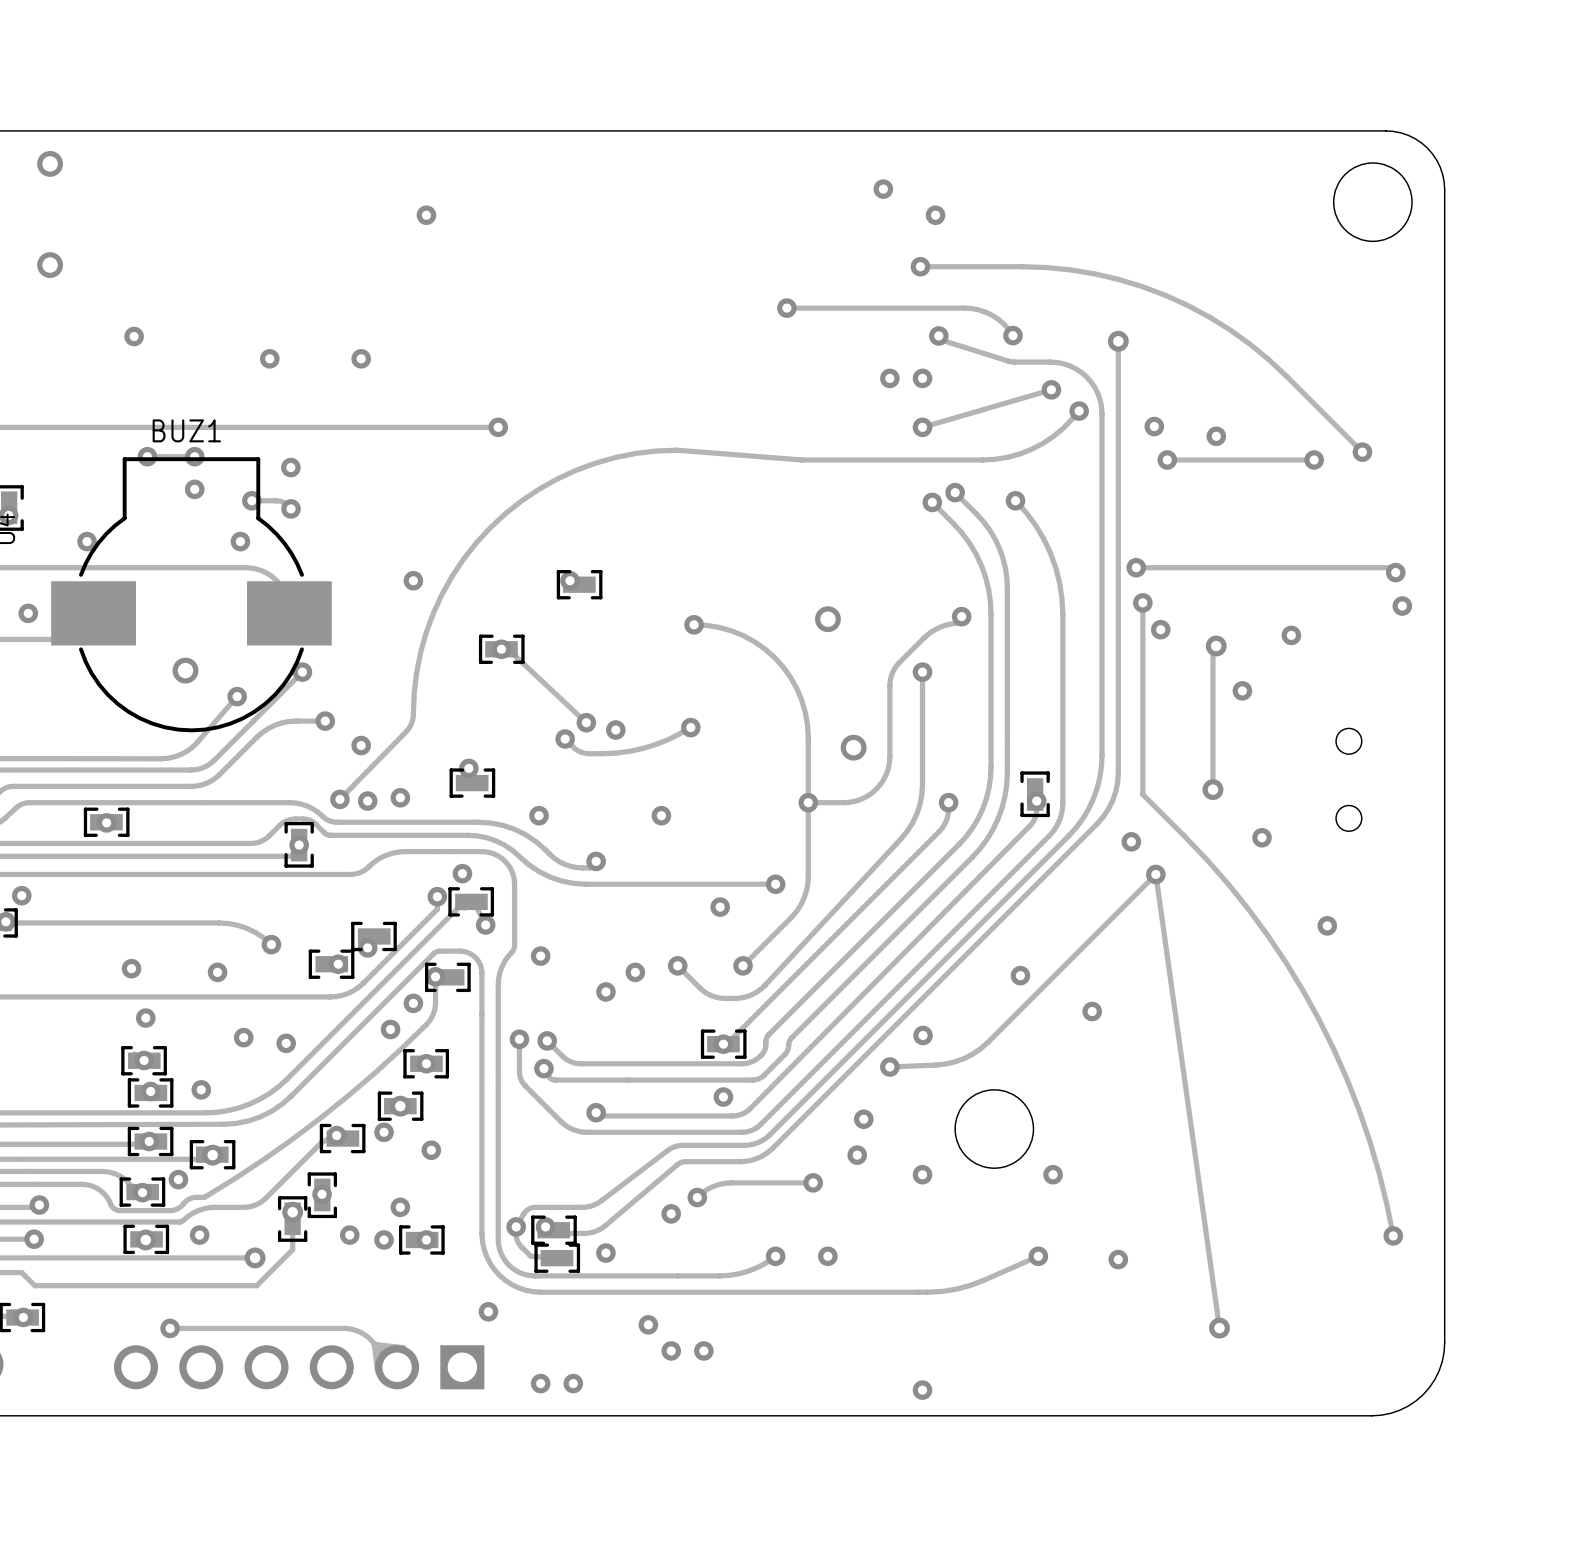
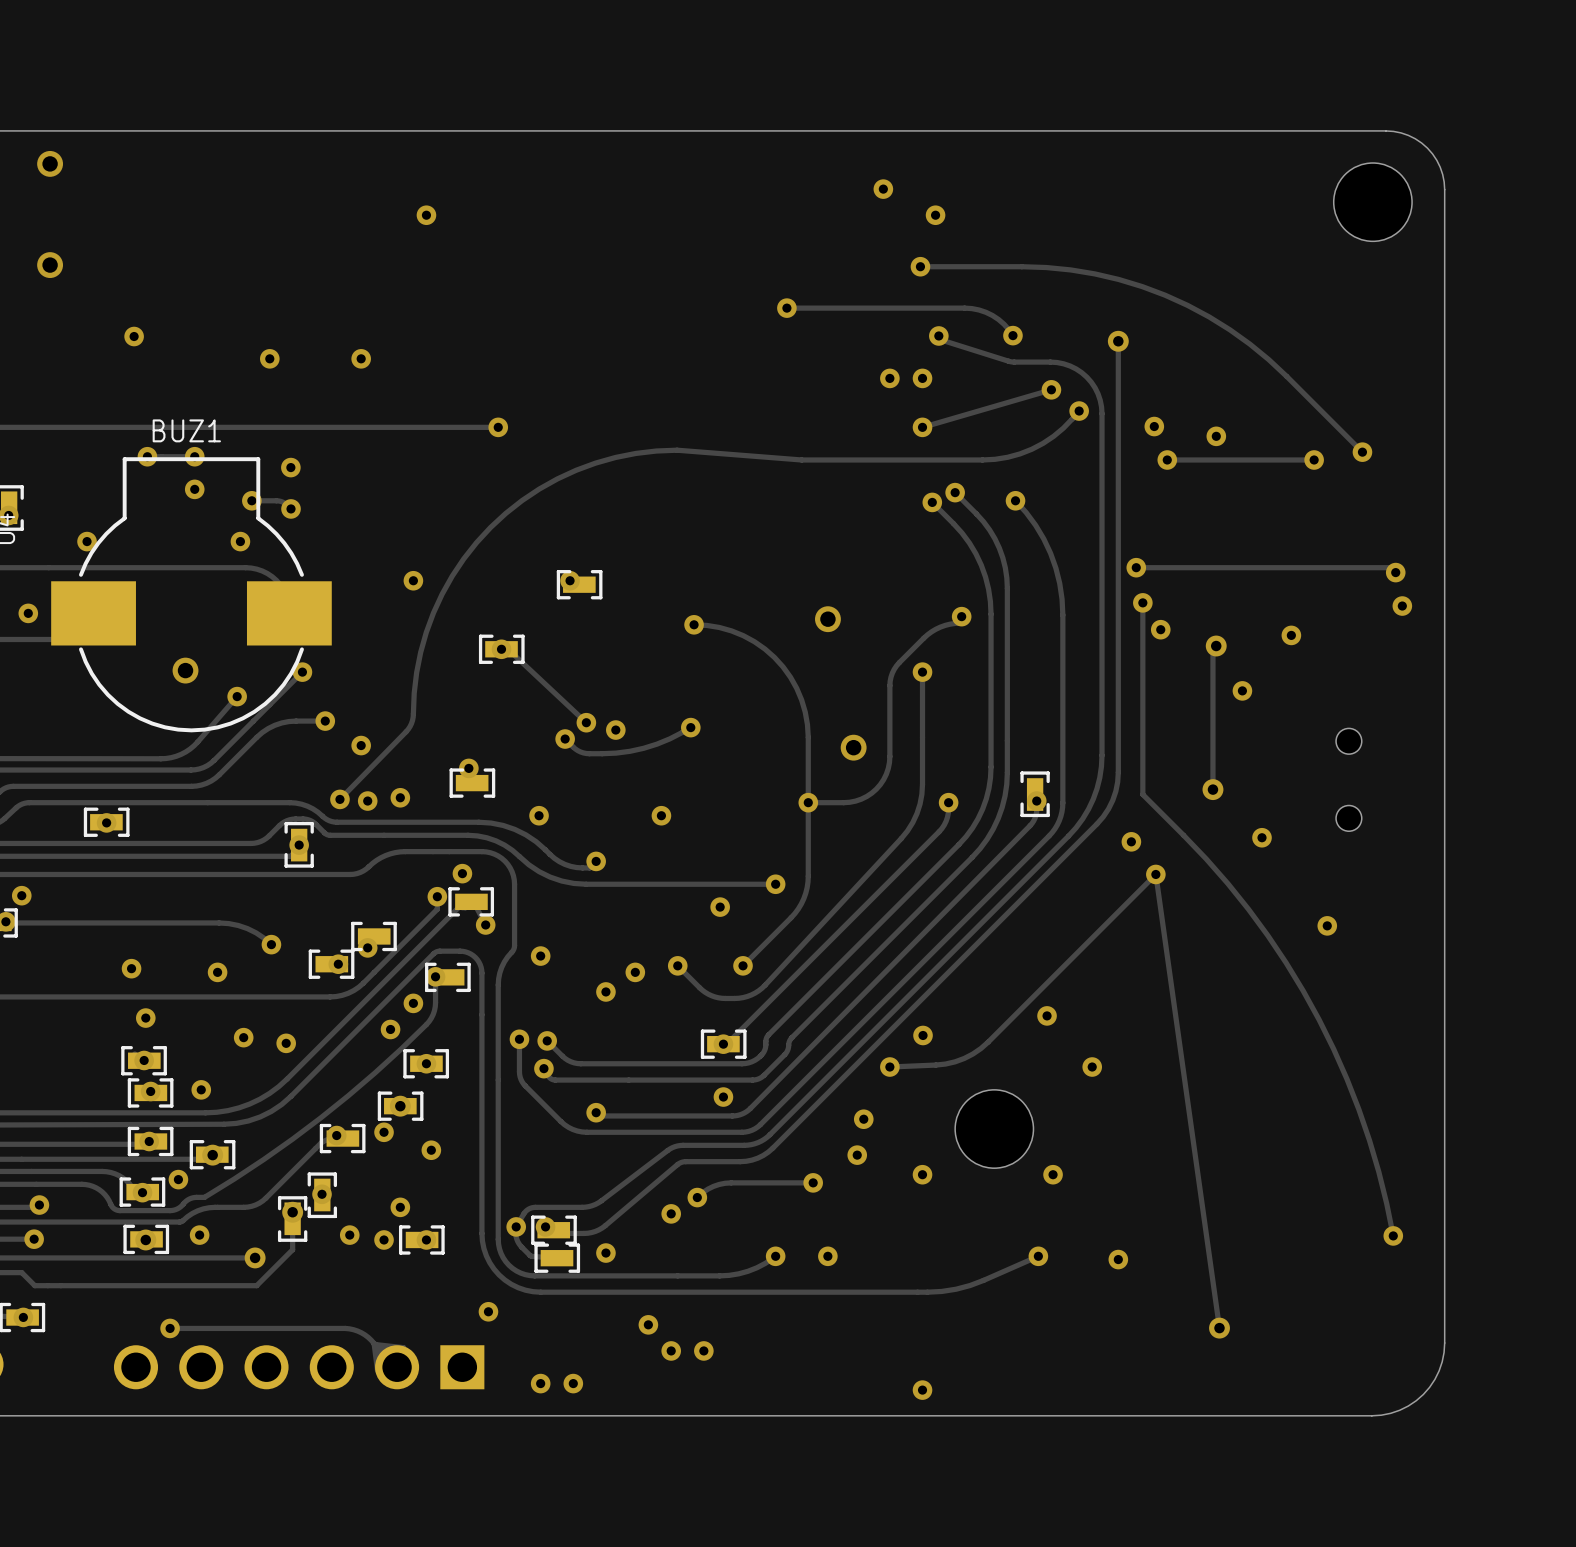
via: (1020, 975) -> none
via: (1092, 1011) -> none
via: none -> (1047, 1015)
via: none -> (1092, 1067)

